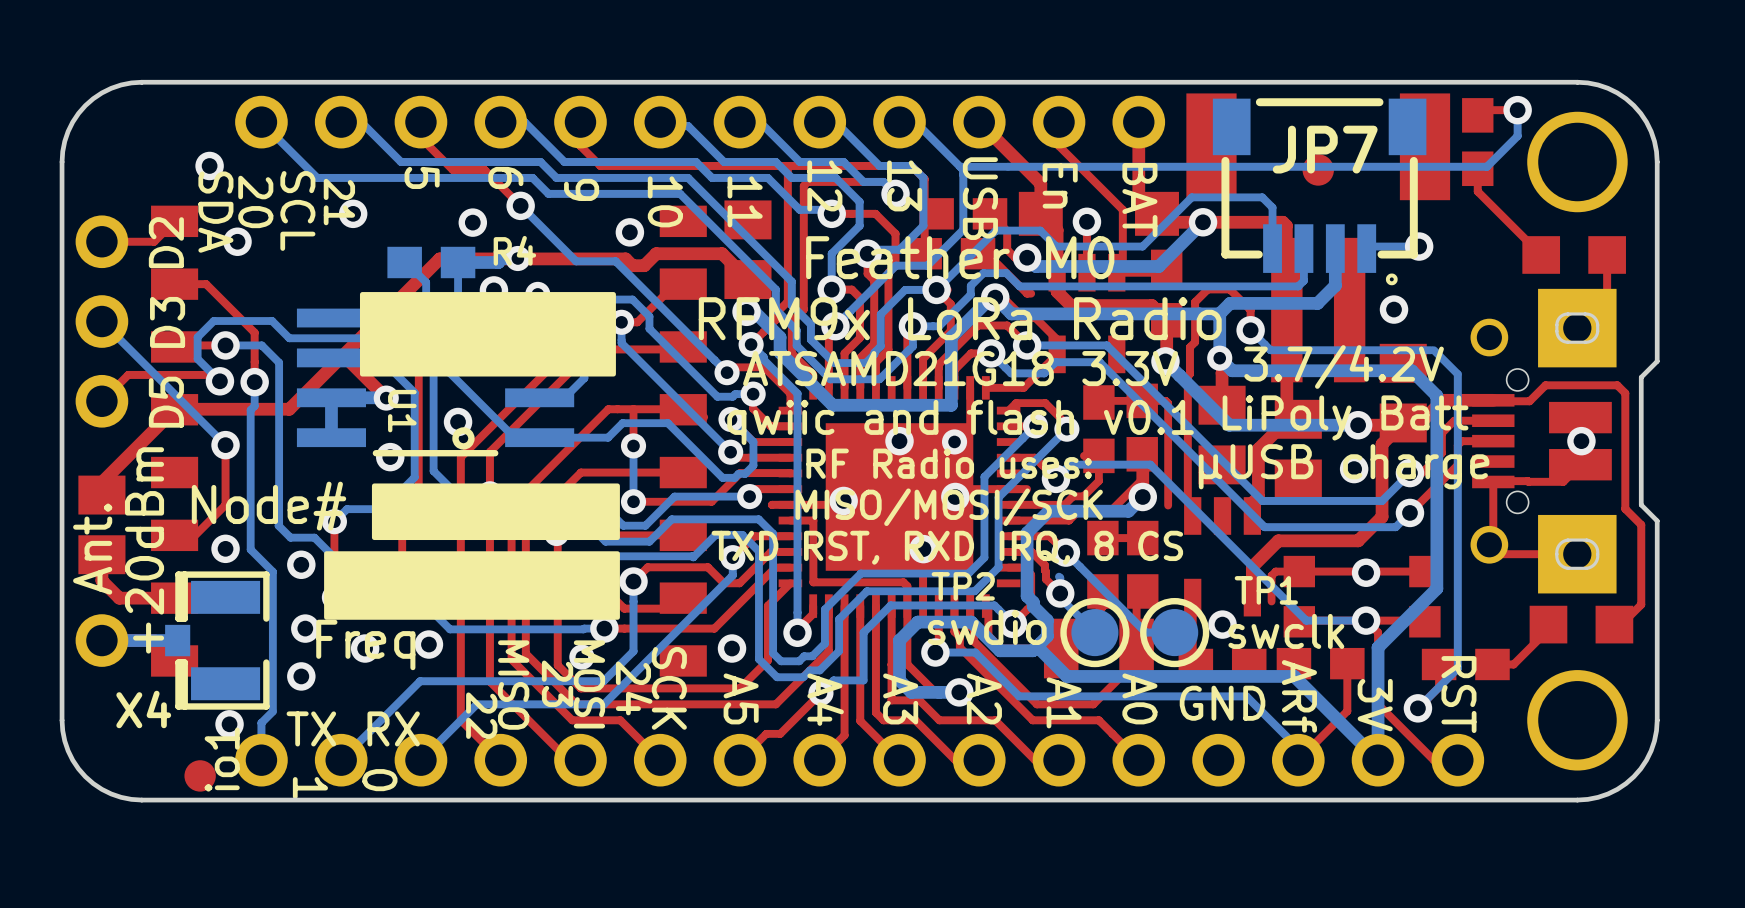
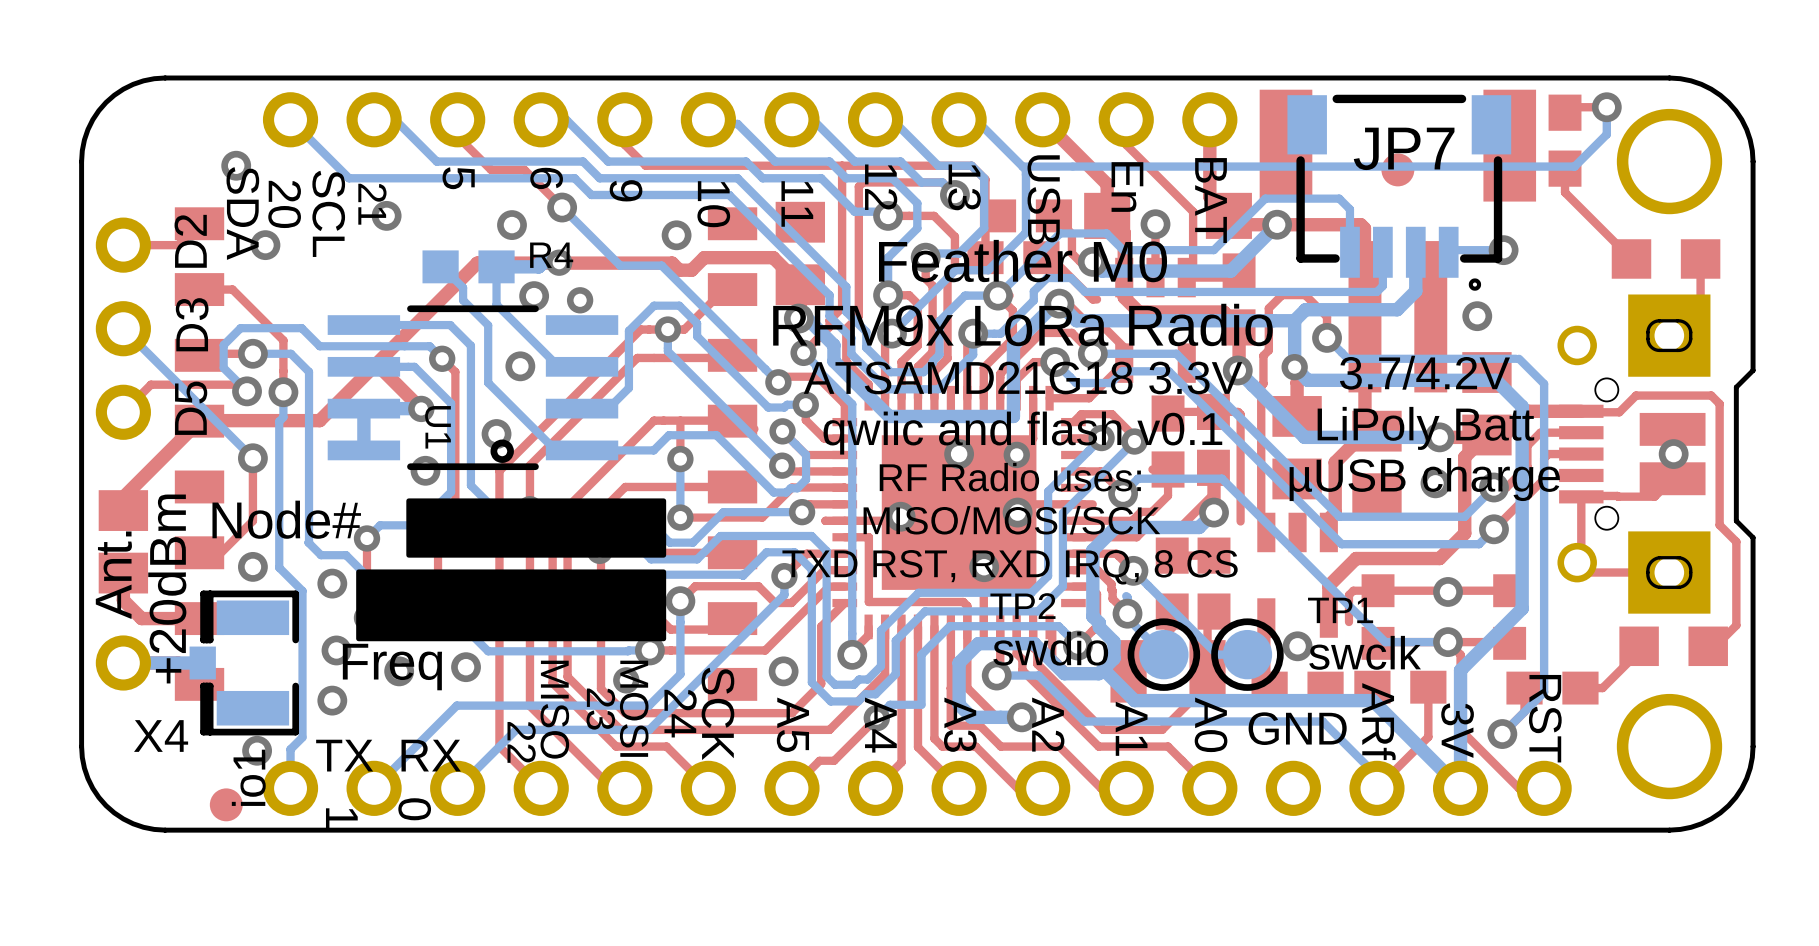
drawing: [359, 292, 616, 377] -> none

